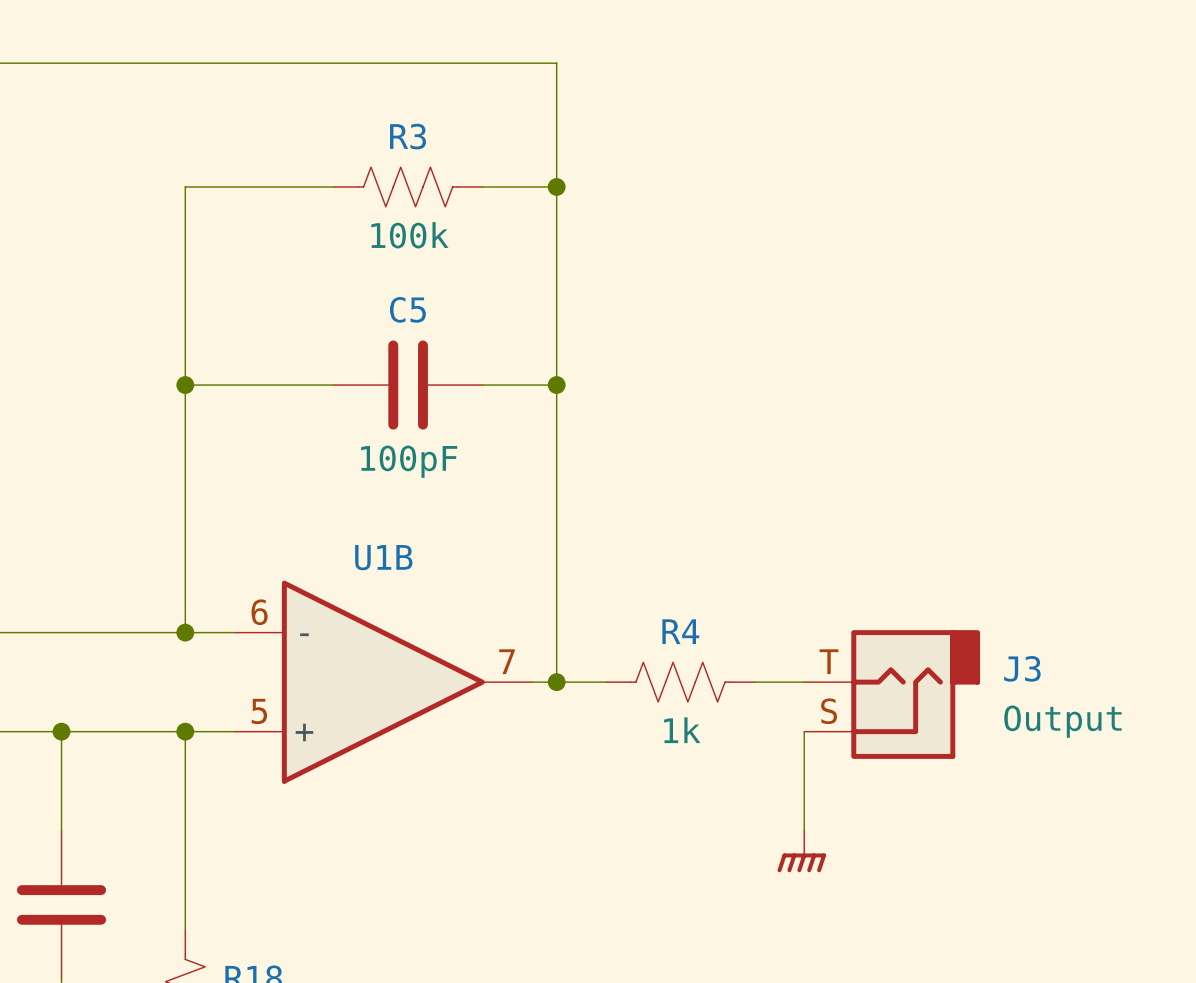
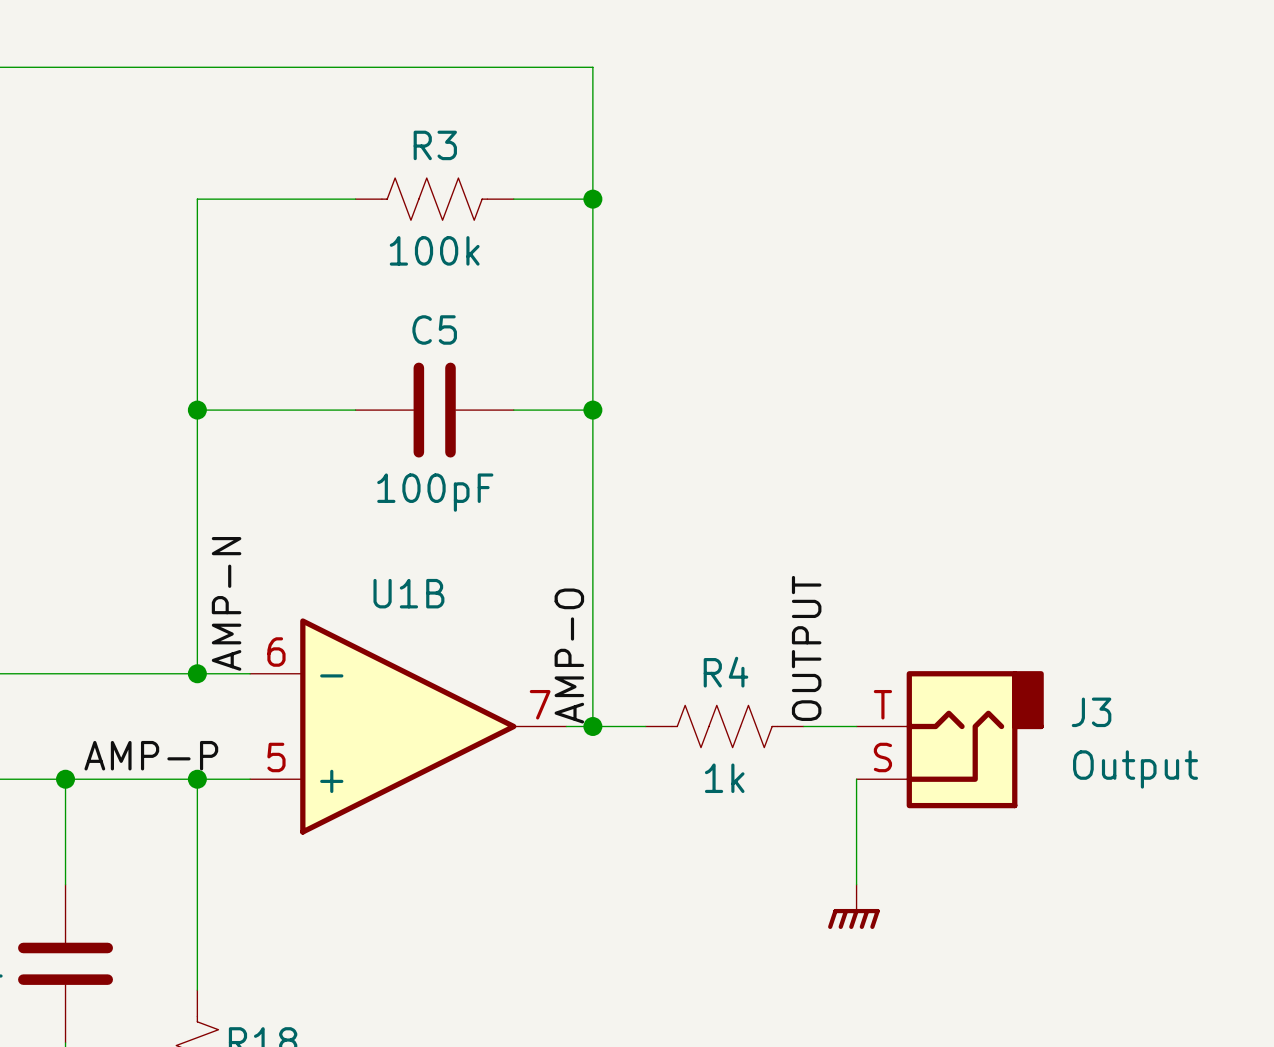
label: none -> AMP-N (226, 603)
label: none -> OUTPUT (806, 648)
label: none -> AMP-O (569, 655)
label: none -> AMP-P (151, 755)

